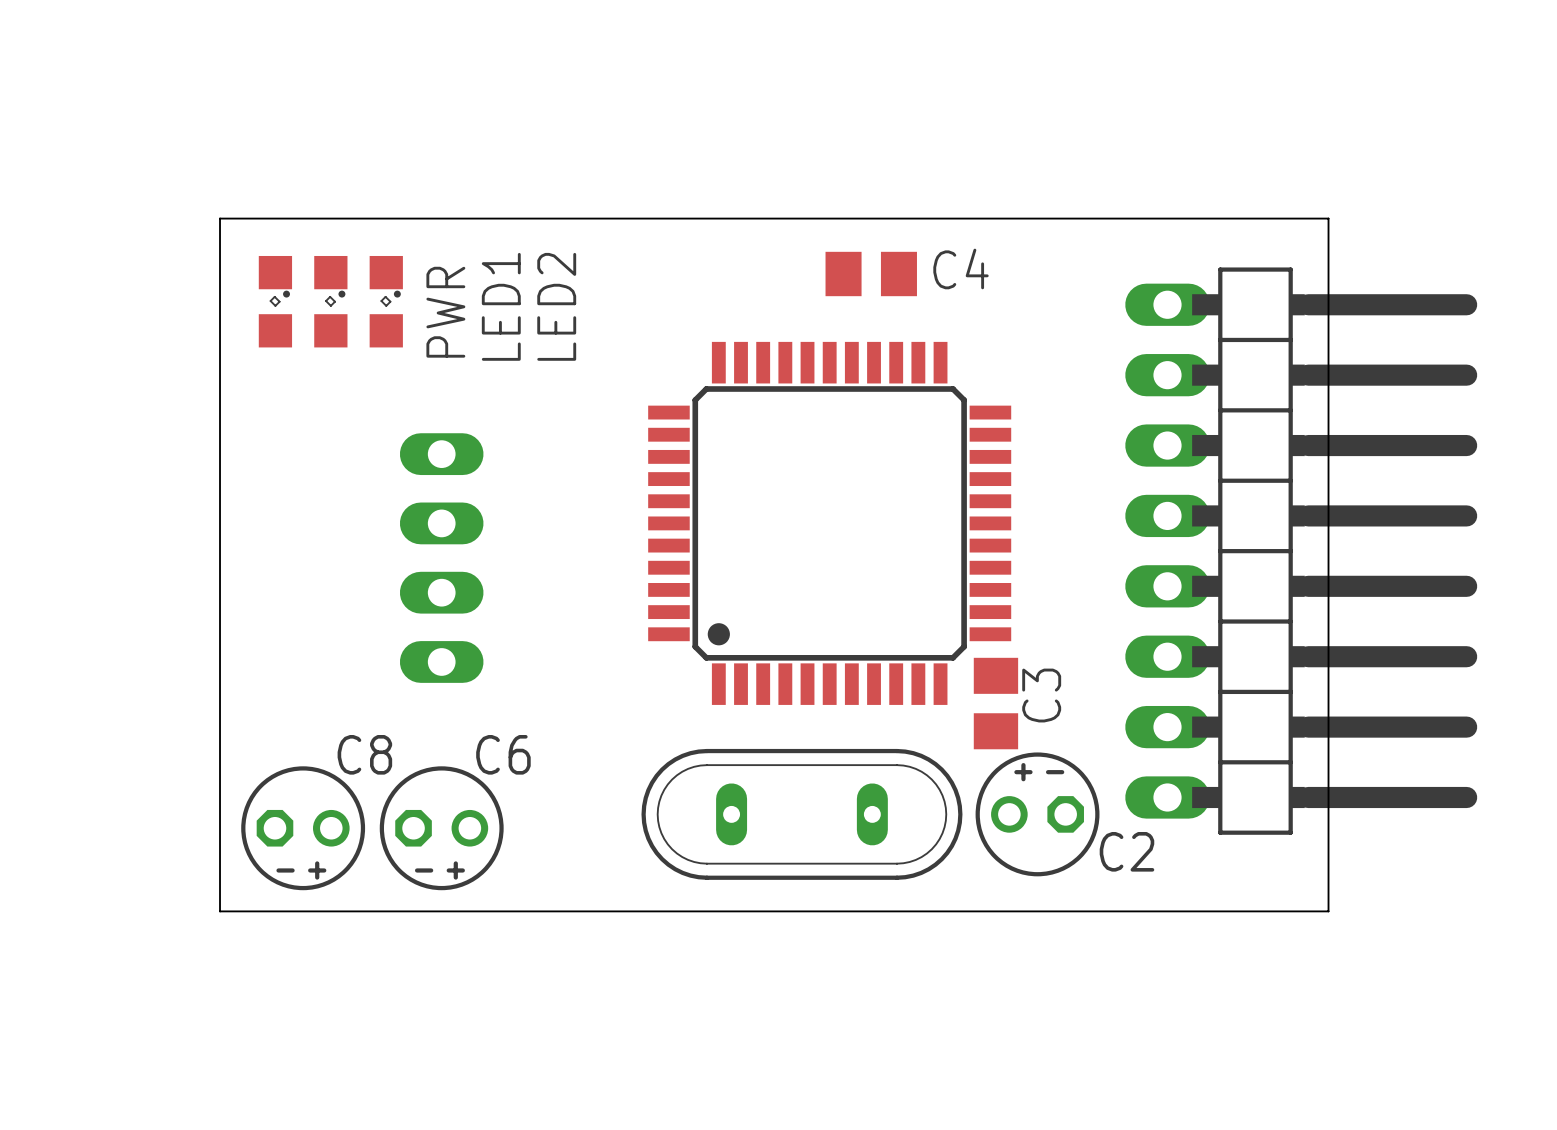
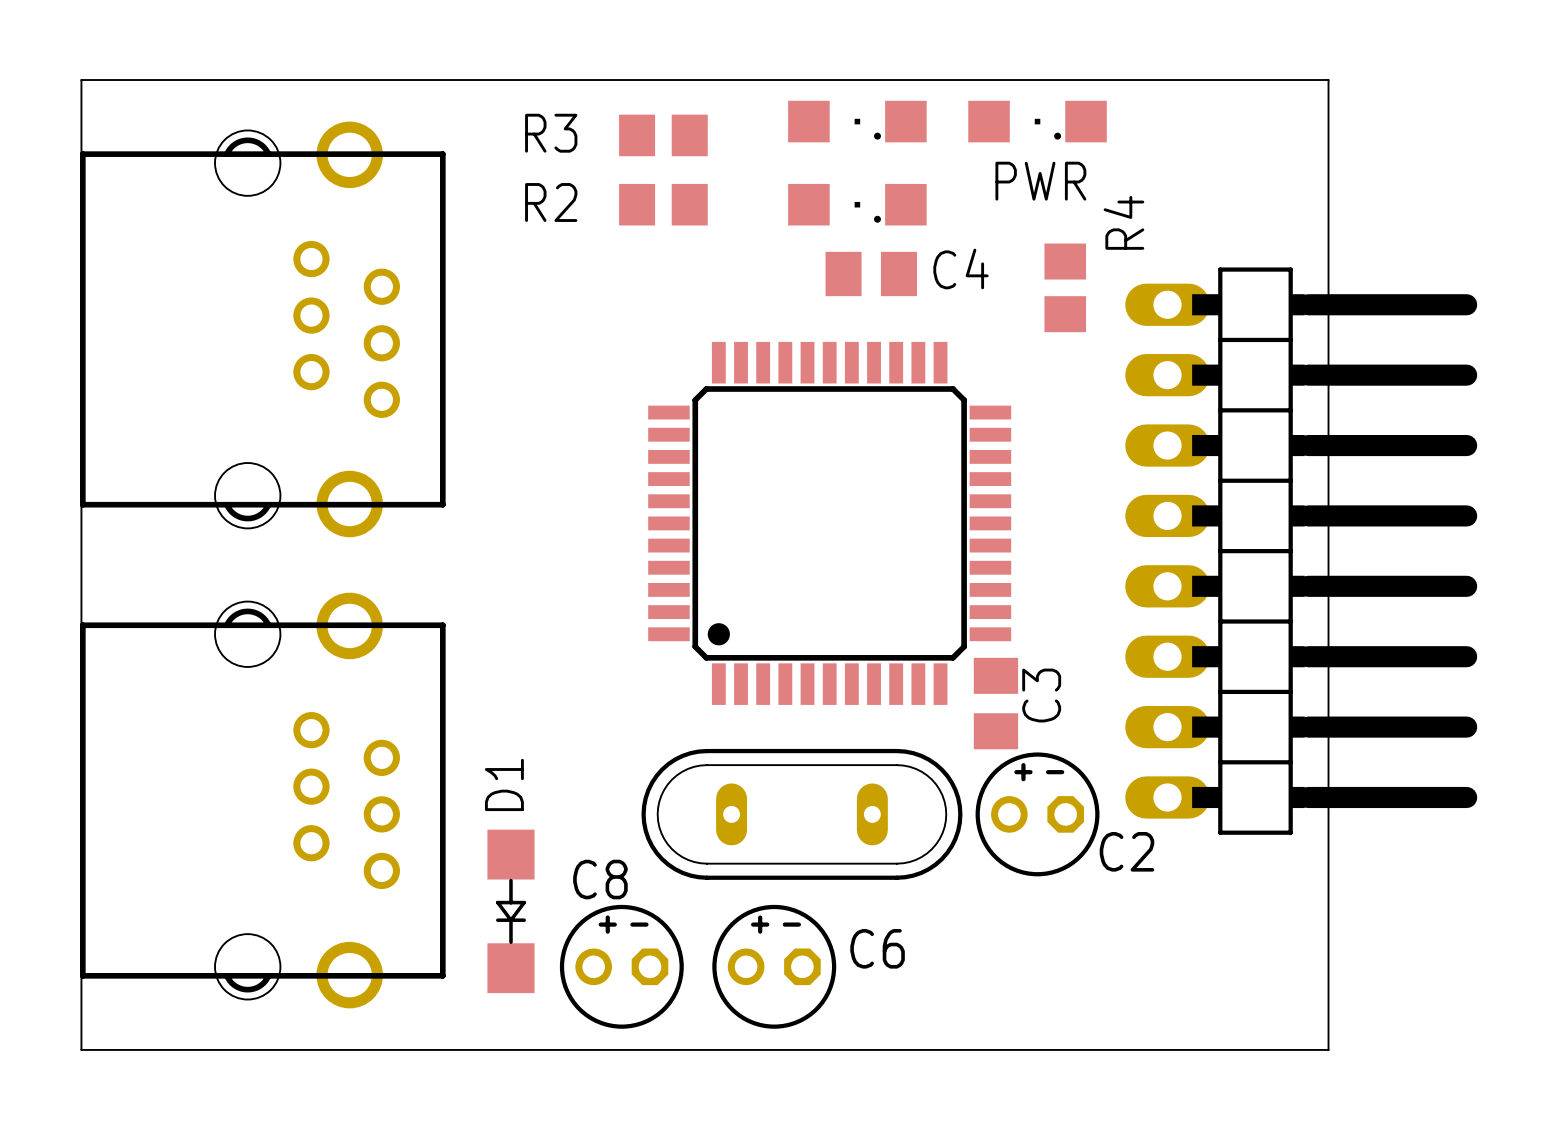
part: none -> (857, 121)
PWR: none -> (1037, 121)
R3: none -> (663, 135)
R2: none -> (663, 204)
part: none -> (857, 204)
board edge: (1328, 218) (220, 218) (220, 911) (1328, 911) -> (1328, 218) (1328, 80) (81, 80) (81, 1049) (1328, 1049) (1328, 911)
R4: none -> (1065, 287)
PWR: (275, 301) -> none
LED1: (330, 301) -> none
LED2: (386, 301) -> none
part: none -> (262, 329)
part: (441, 558) -> none
C8 name position: C8 (364, 754) -> C8 (600, 879)
C6 name position: C6 (503, 754) -> C6 (877, 948)
part: none -> (262, 800)
C8 rotation: 0° (303, 828) -> 180° (621, 966)
C8 position: (303, 828) -> (621, 966)
C6 rotation: 0° (441, 828) -> 180° (774, 966)
C6 position: (441, 828) -> (774, 966)
D1: none -> (510, 911)

